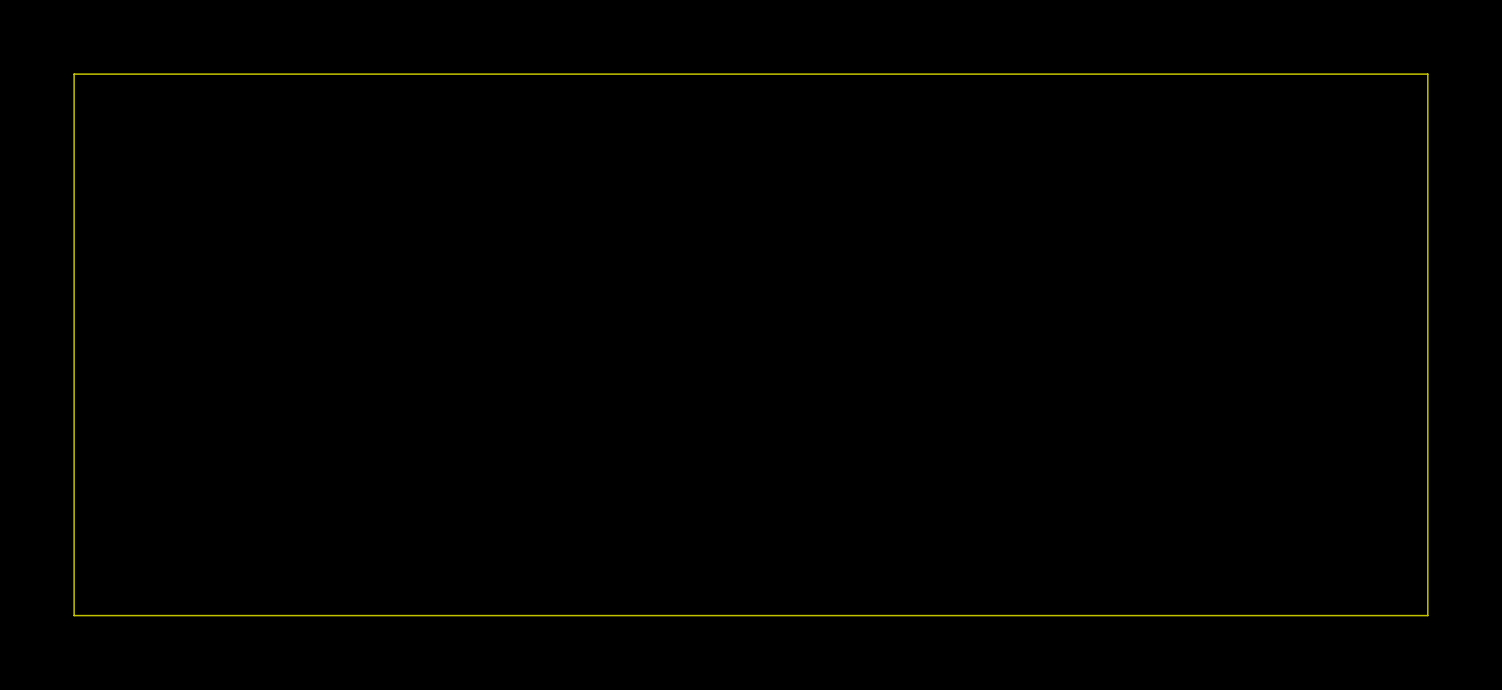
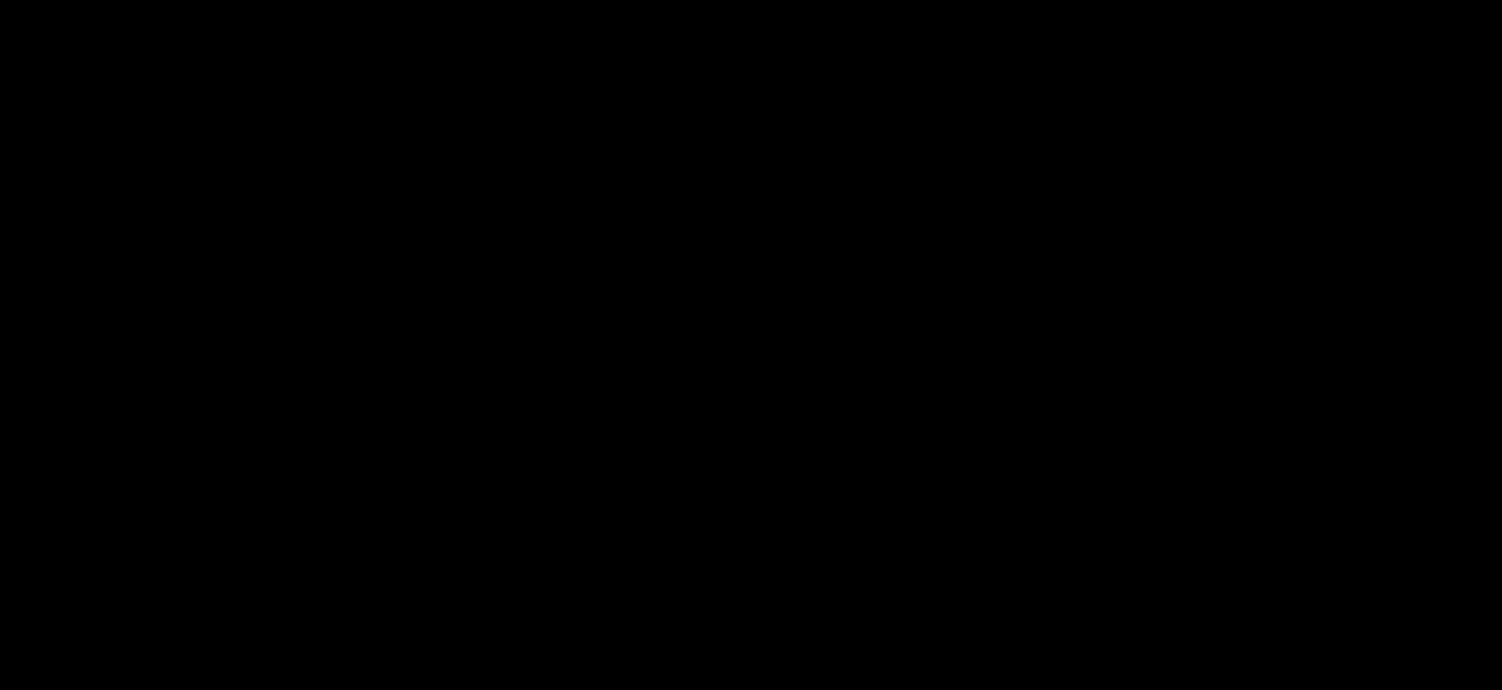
board edge: (74, 74) (74, 615) (1427, 615) (1427, 74) (74, 74) -> none

